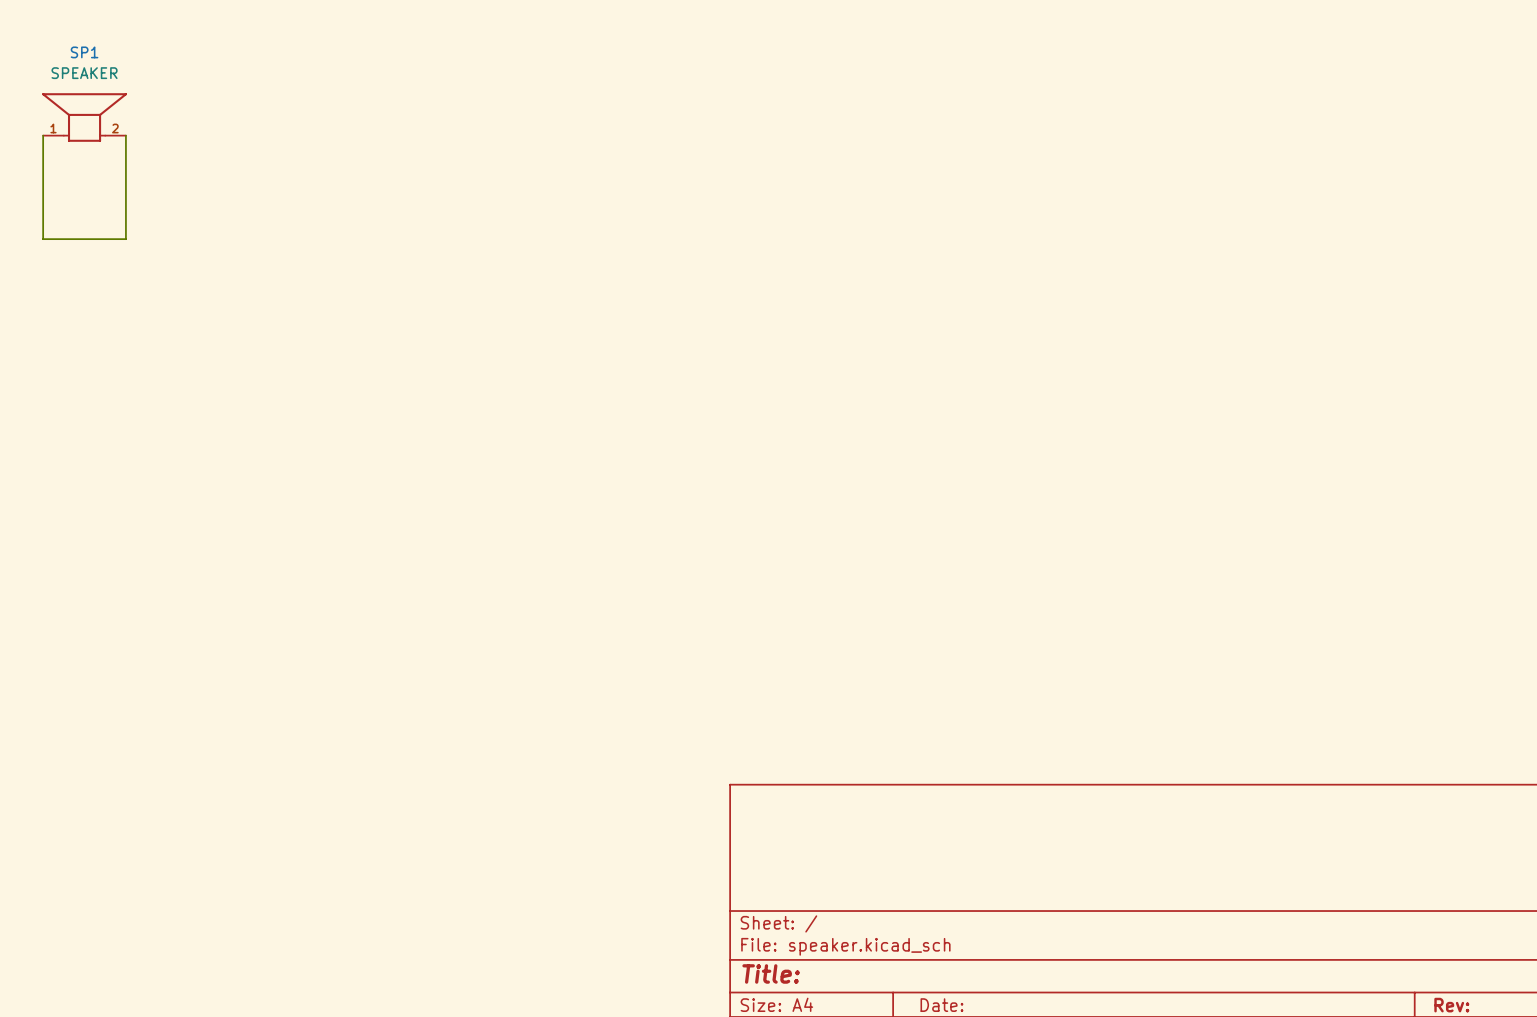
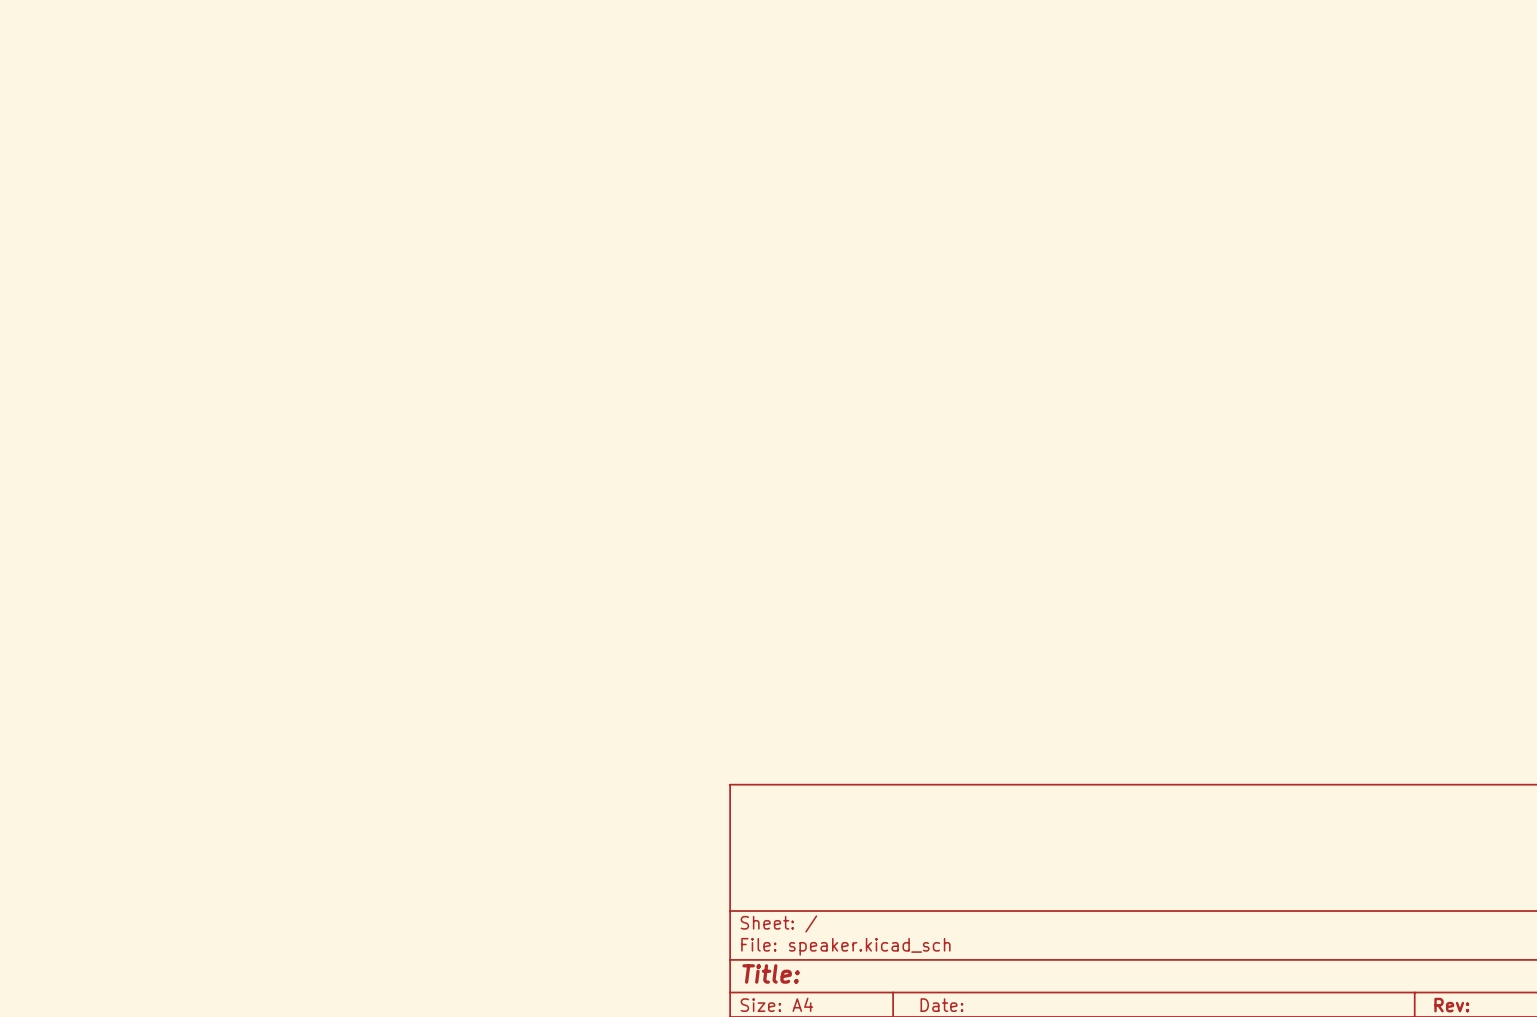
SP1: SPEAKER (84, 117) -> none
wire: (43, 135) (43, 239) (125, 239) (125, 135) -> none

